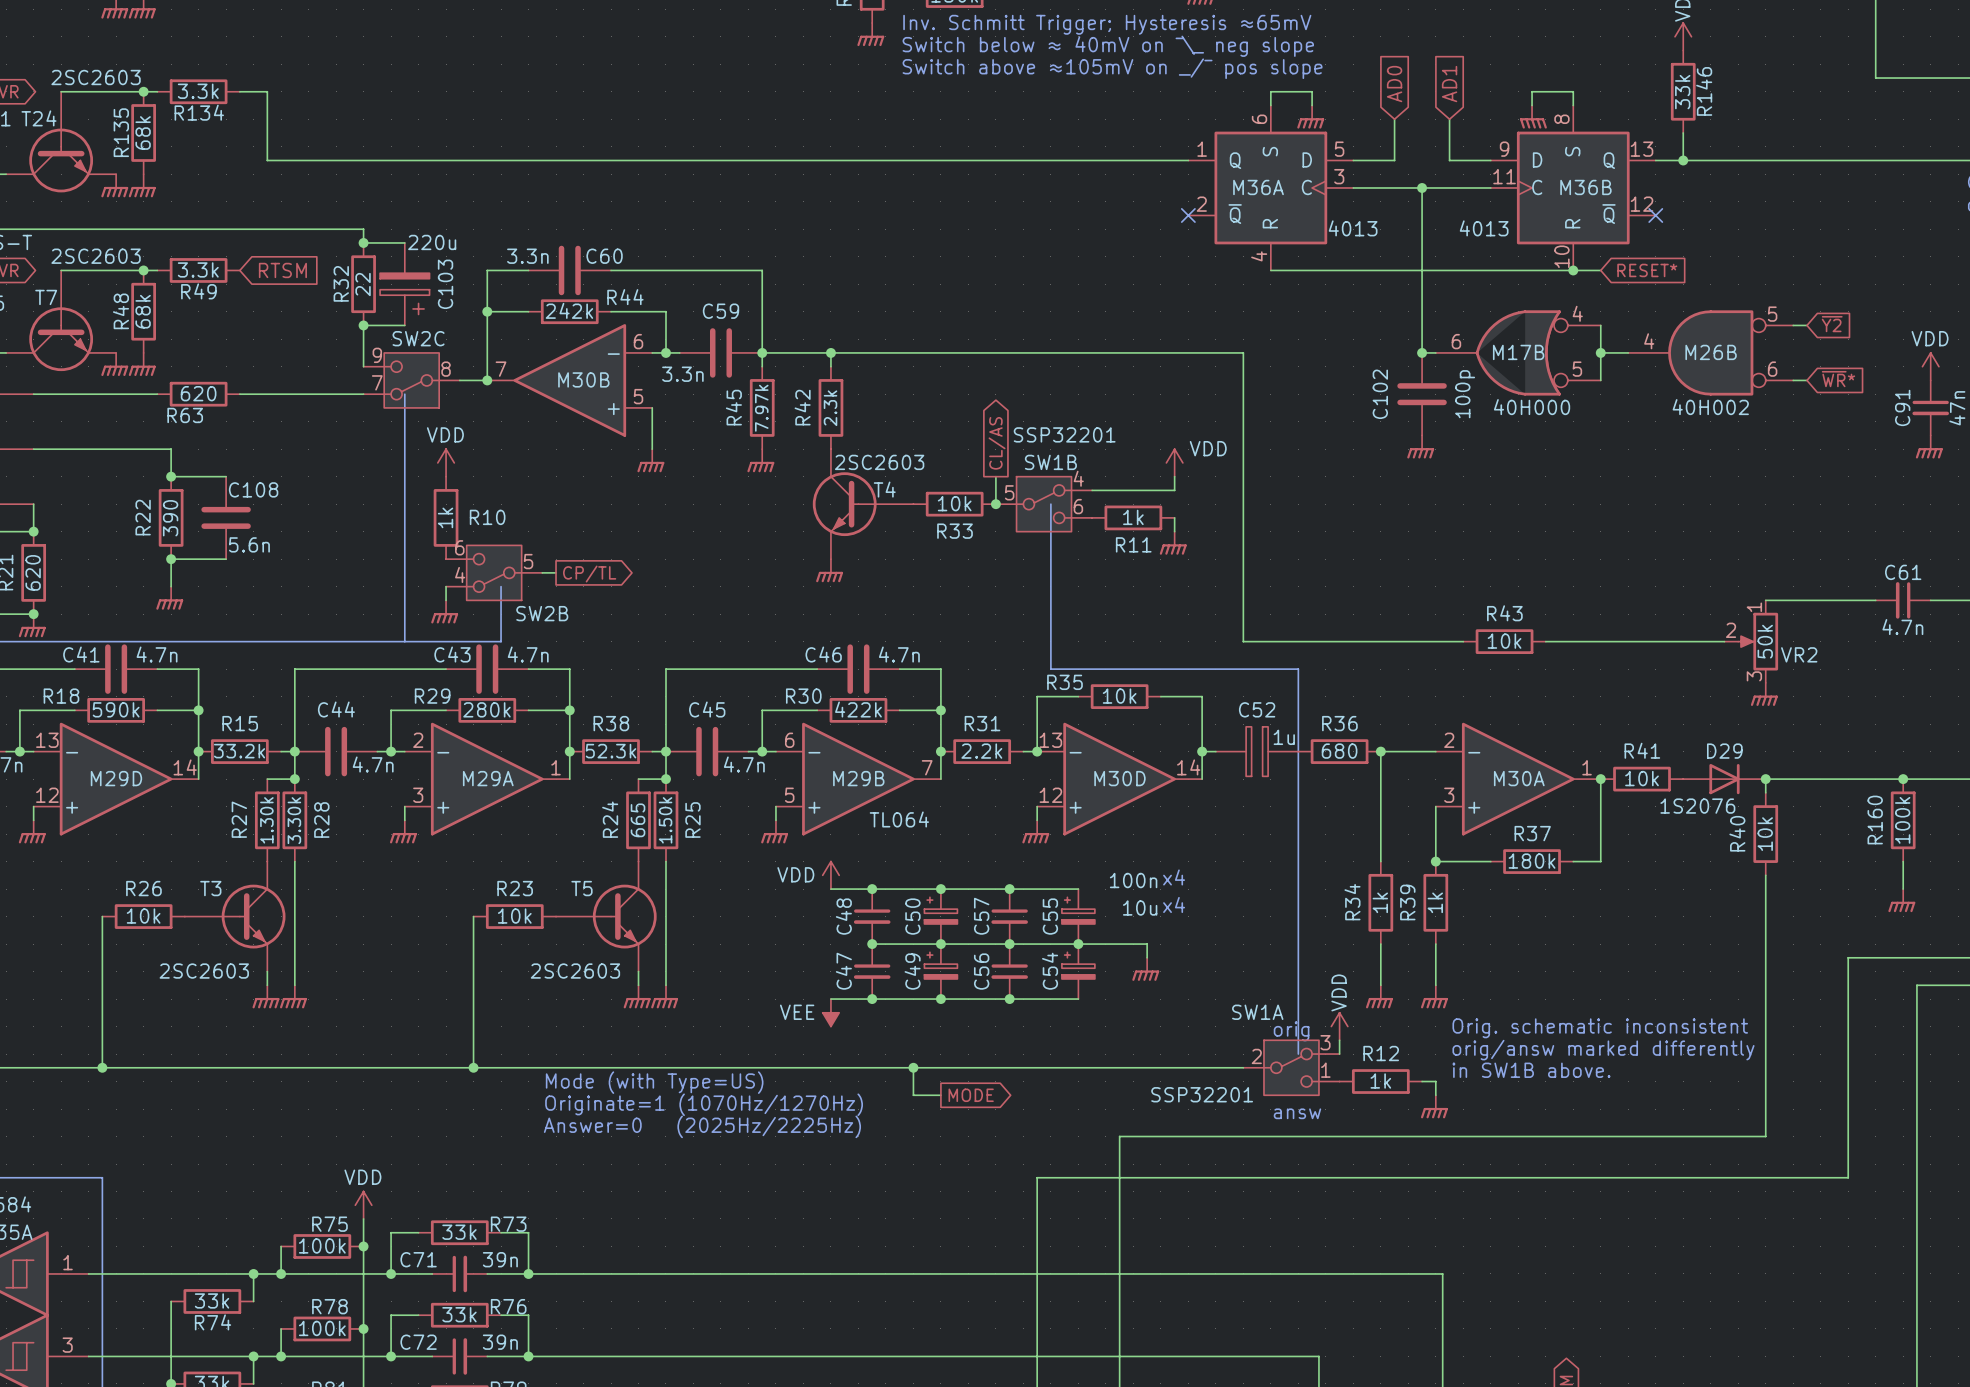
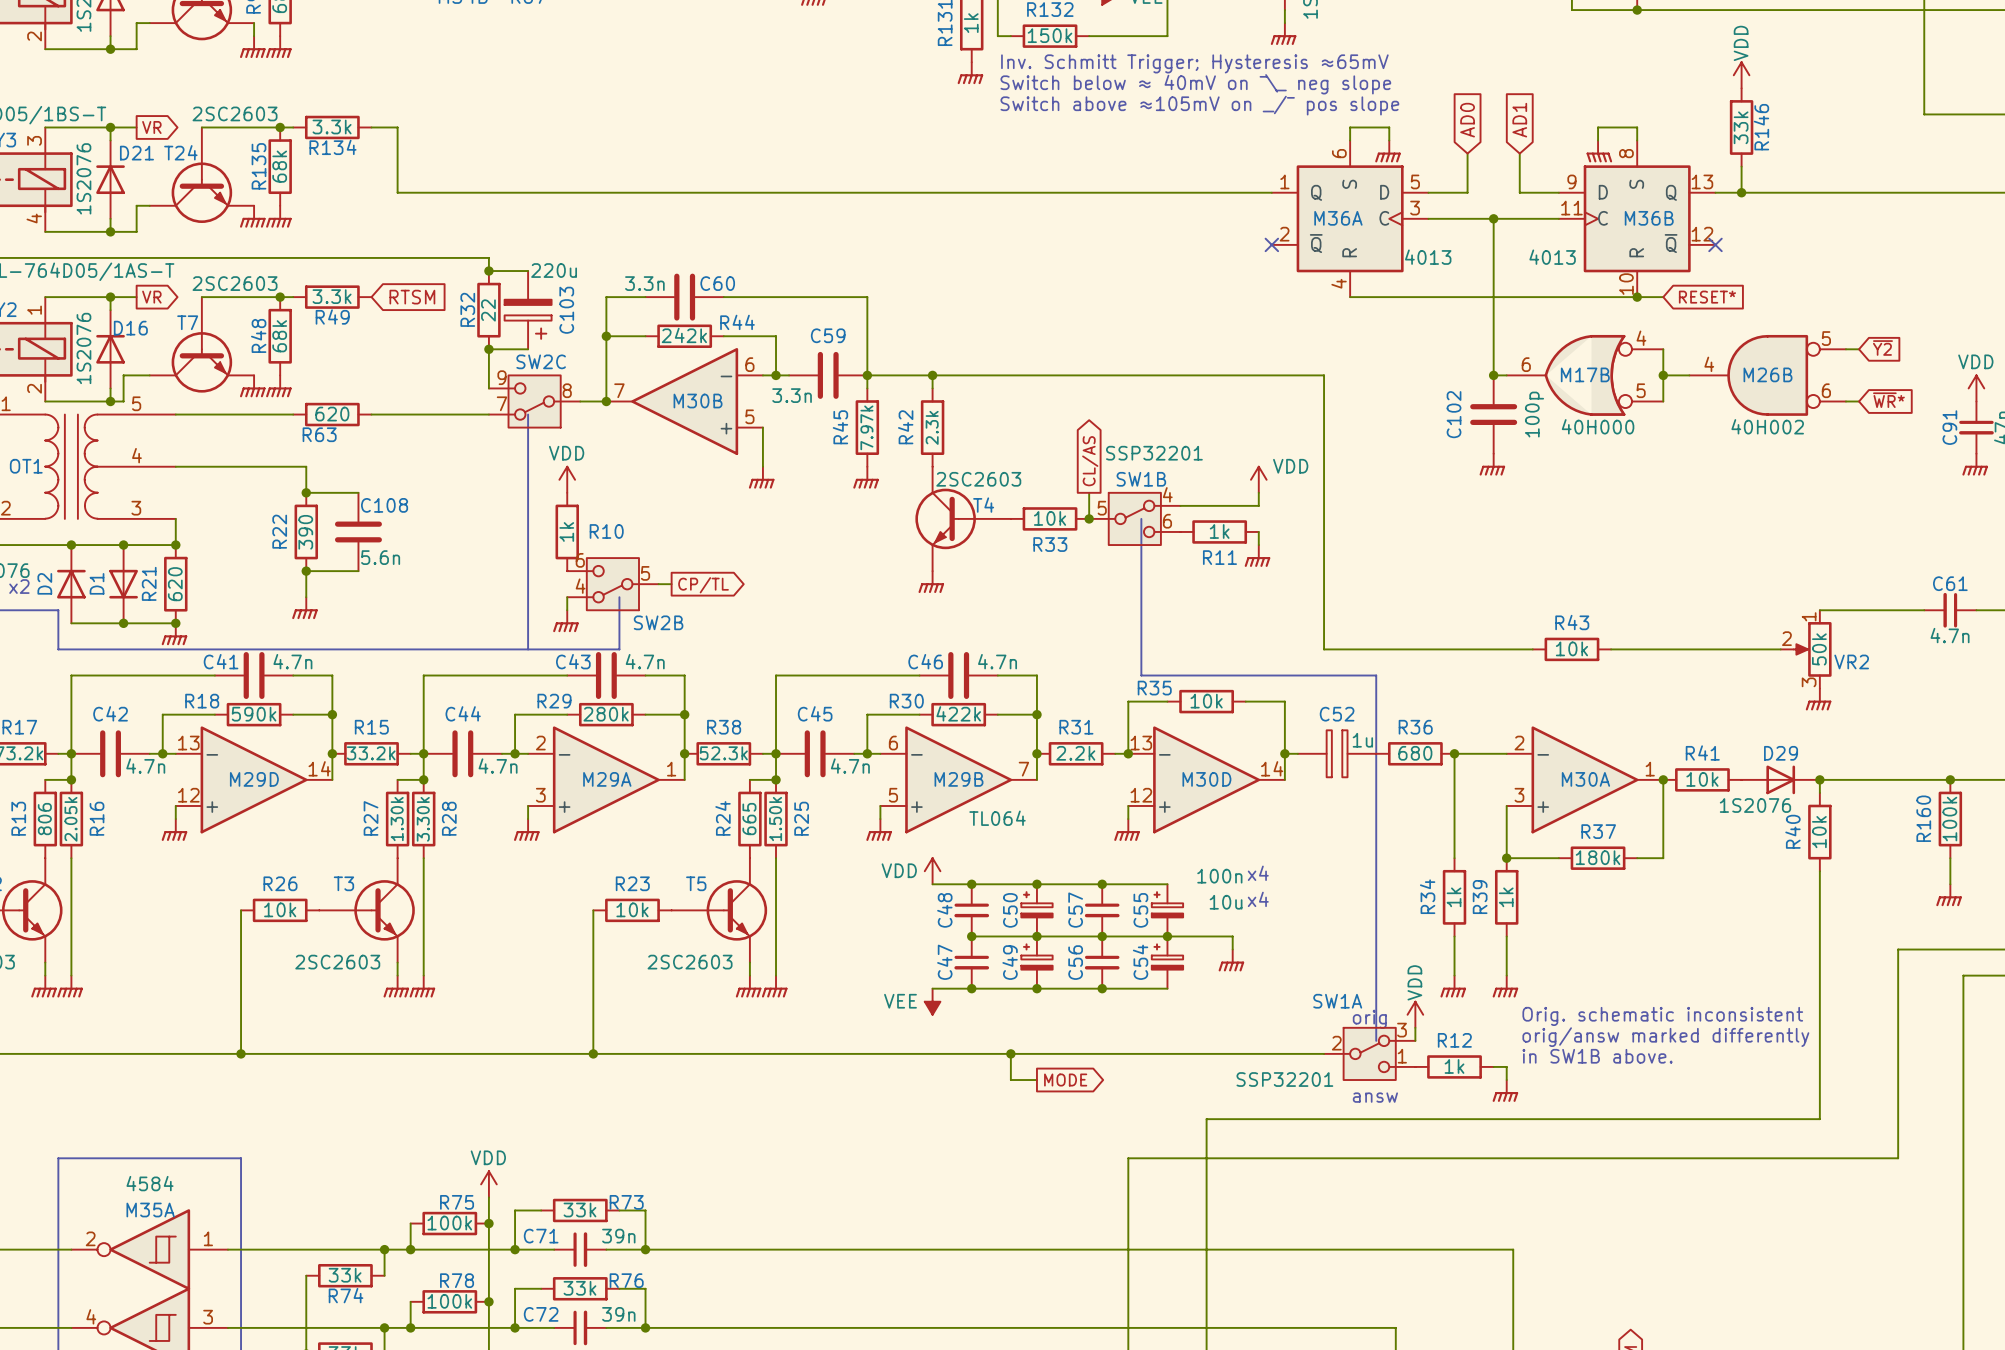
text: Mode (with Type=US) (654, 1082) -> none
text: Originate=1 (1070Hz/1270Hz) (704, 1104) -> none
text: Answer=0 (2025Hz/2225Hz) (702, 1126) -> none

